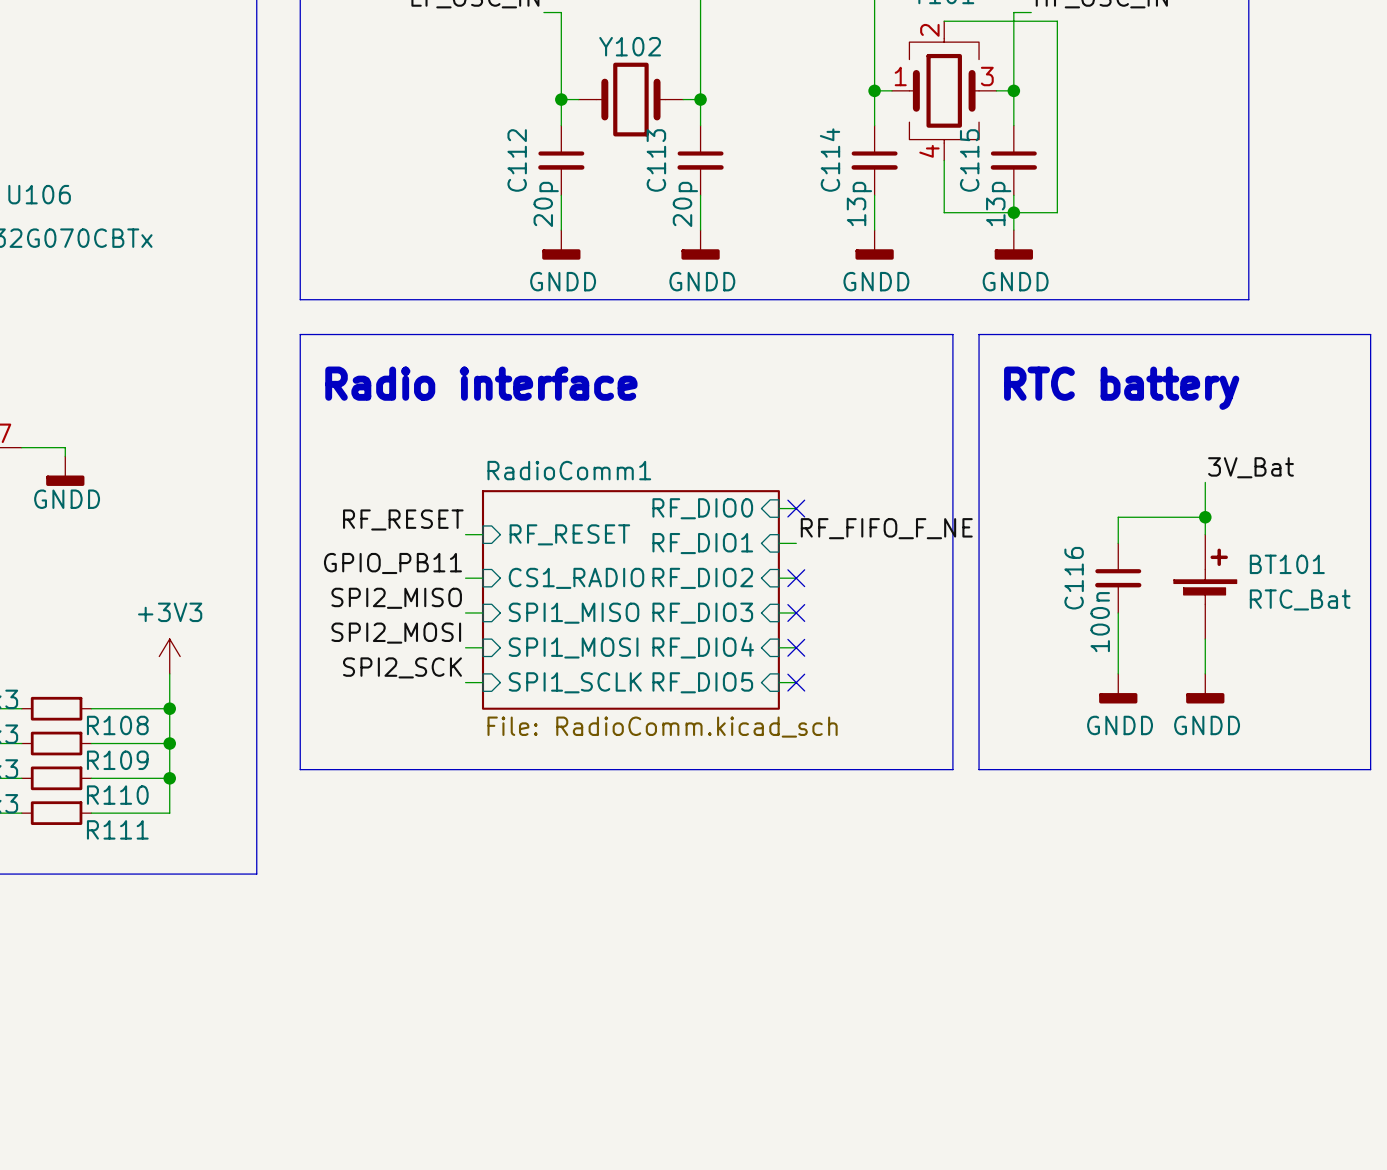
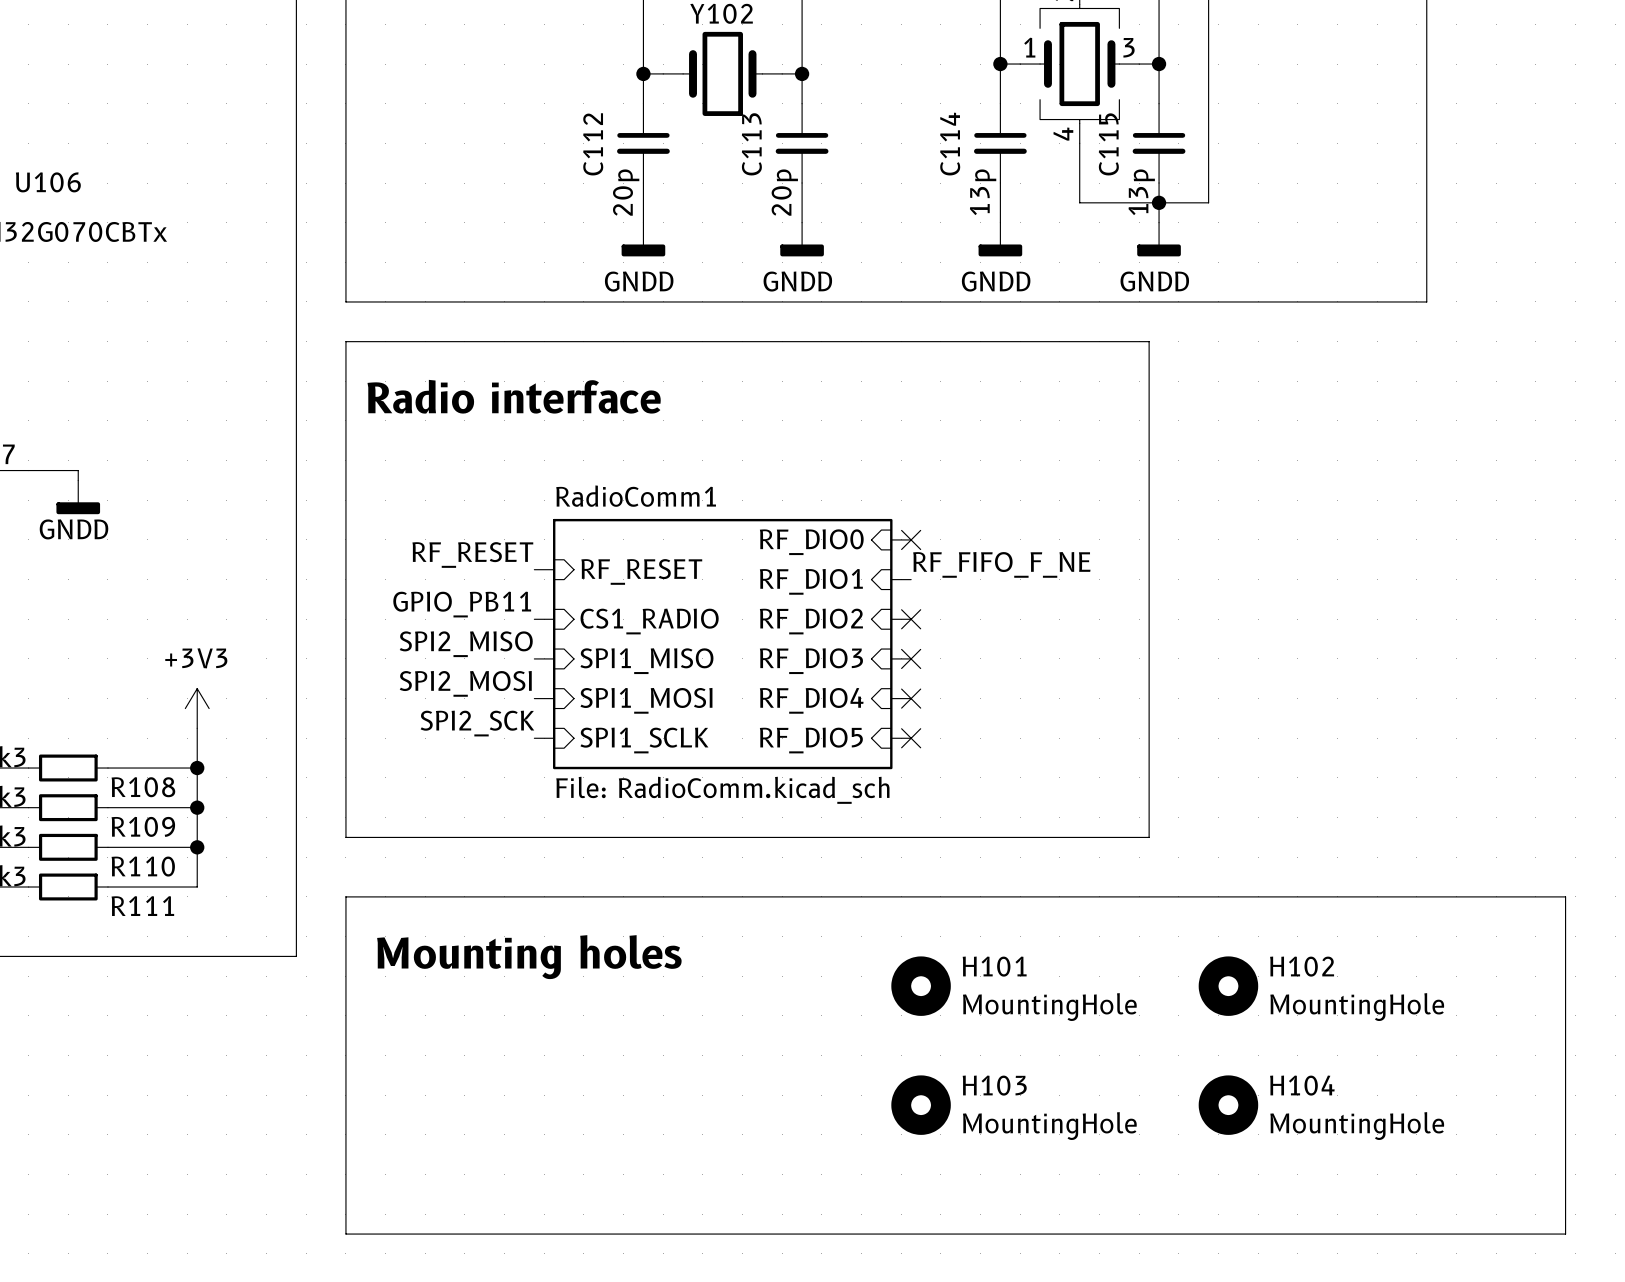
line: (952, 334) (952, 769) -> (1089, 341) (1119, 341)
line: (979, 334) (979, 769) -> (1089, 837) (1119, 837)
line: (1005, 334) (1370, 334) (1370, 769) (1005, 769) -> (1149, 341) (1149, 837)
text: RTC battery (1121, 388) -> none
label: 3V_Bat (1251, 467) -> none
wire: (1205, 482) (1205, 534) -> none
wire: (1205, 517) (1118, 517) (1118, 543) -> none
junction: (1205, 517) -> none
C116: 100n (1118, 578) -> none
BT101: RTC_Bat (1205, 586) -> none
wire: (1118, 612) (1118, 673) -> none
wire: (1205, 639) (1205, 673) -> none
power symbol: GNDD (1118, 688) -> none
power symbol: GNDD (1205, 688) -> none
line: none -> (345, 896) (345, 1234) (1565, 1234) (1565, 896) (345, 896)
text: none -> Mounting holes (529, 957)
H101: none -> MountingHole (921, 986)
H102: none -> MountingHole (1228, 986)
H103: none -> MountingHole (921, 1105)
H104: none -> MountingHole (1228, 1105)

